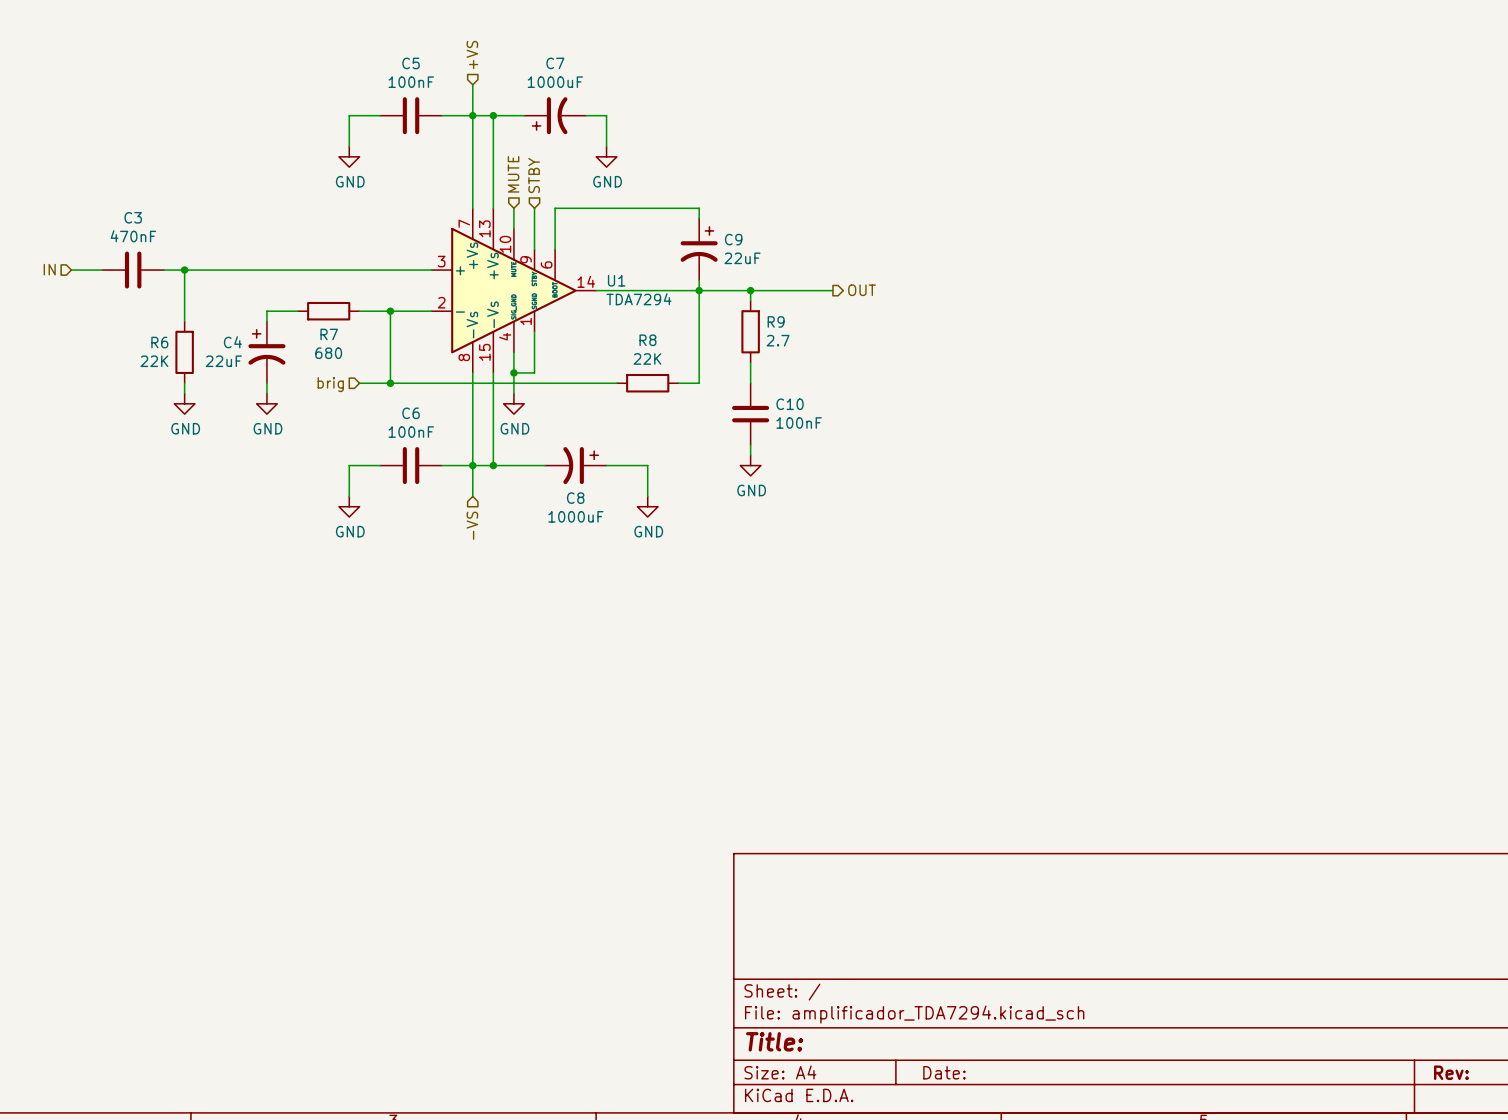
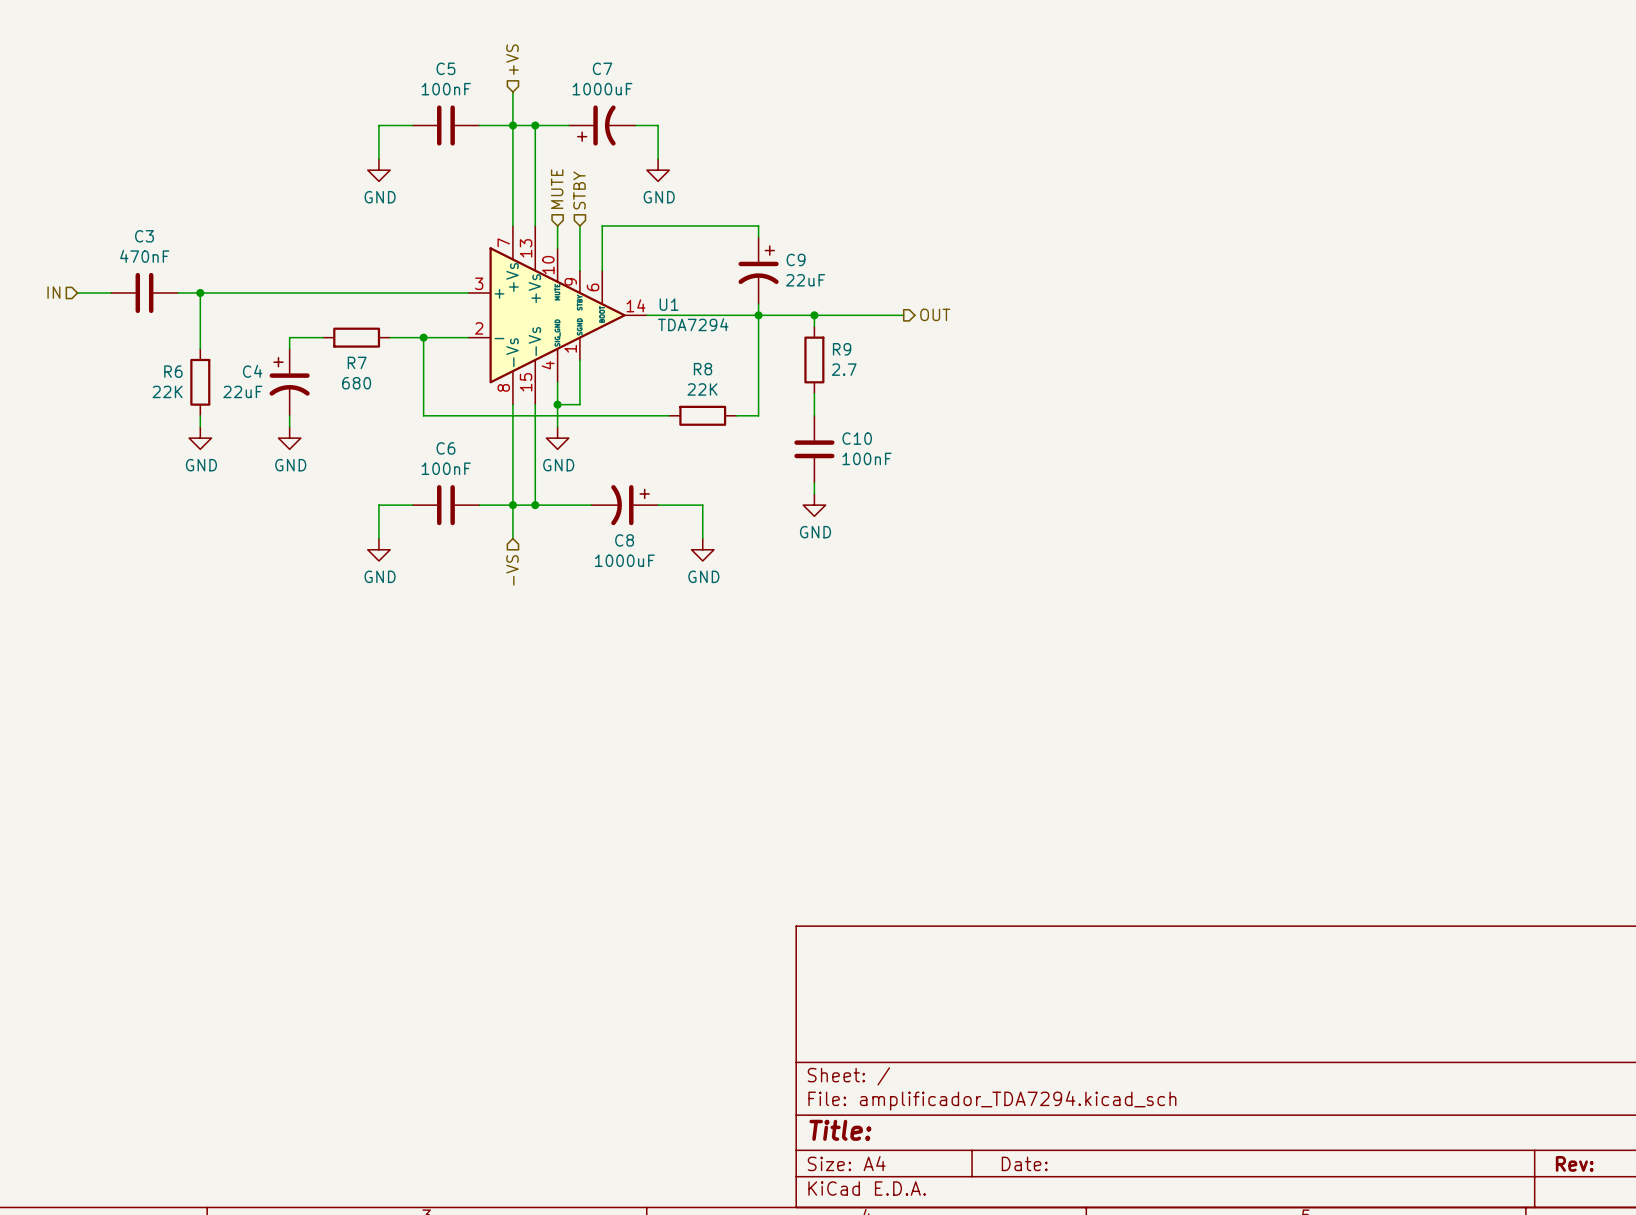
wire: (359, 383) (390, 383) -> none
junction: (390, 383) -> none
hierarchical label: brig (330, 384) -> none

